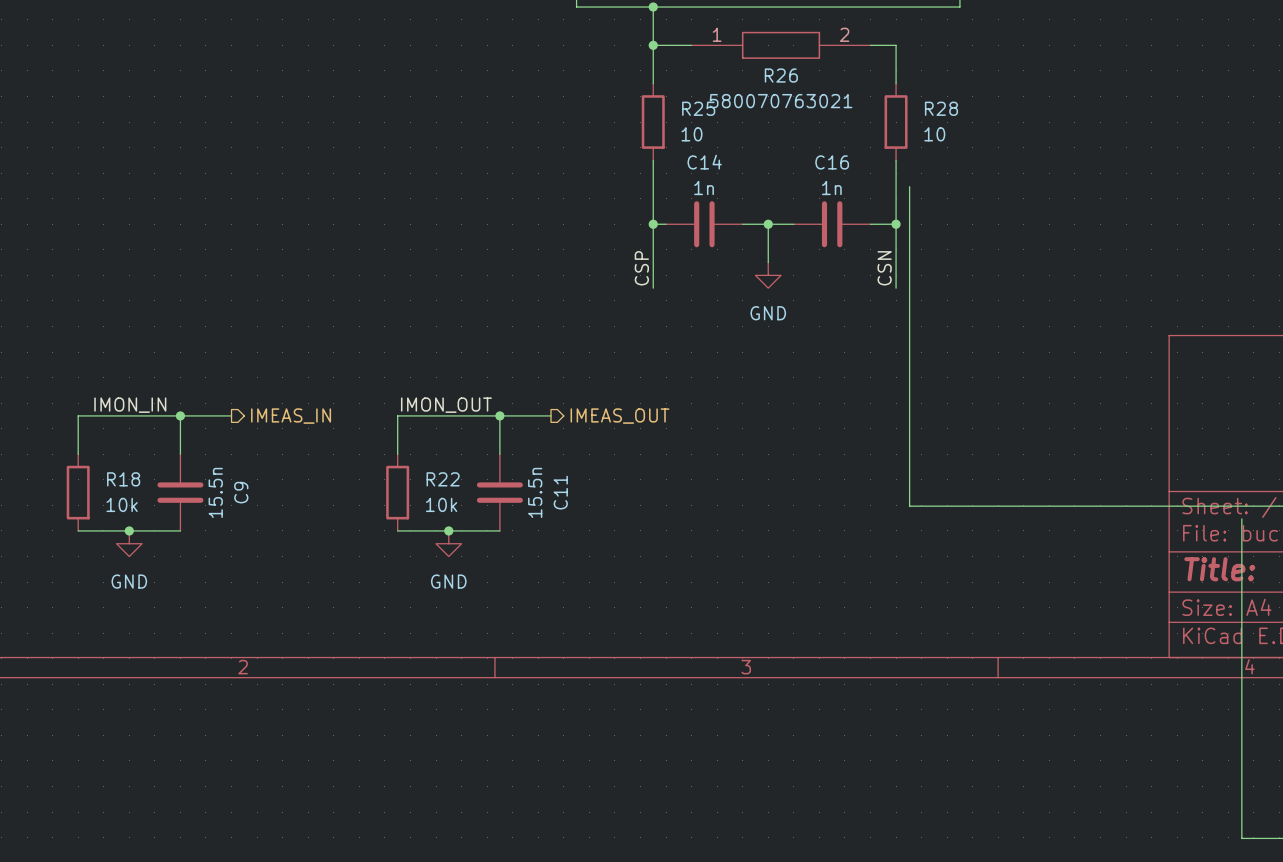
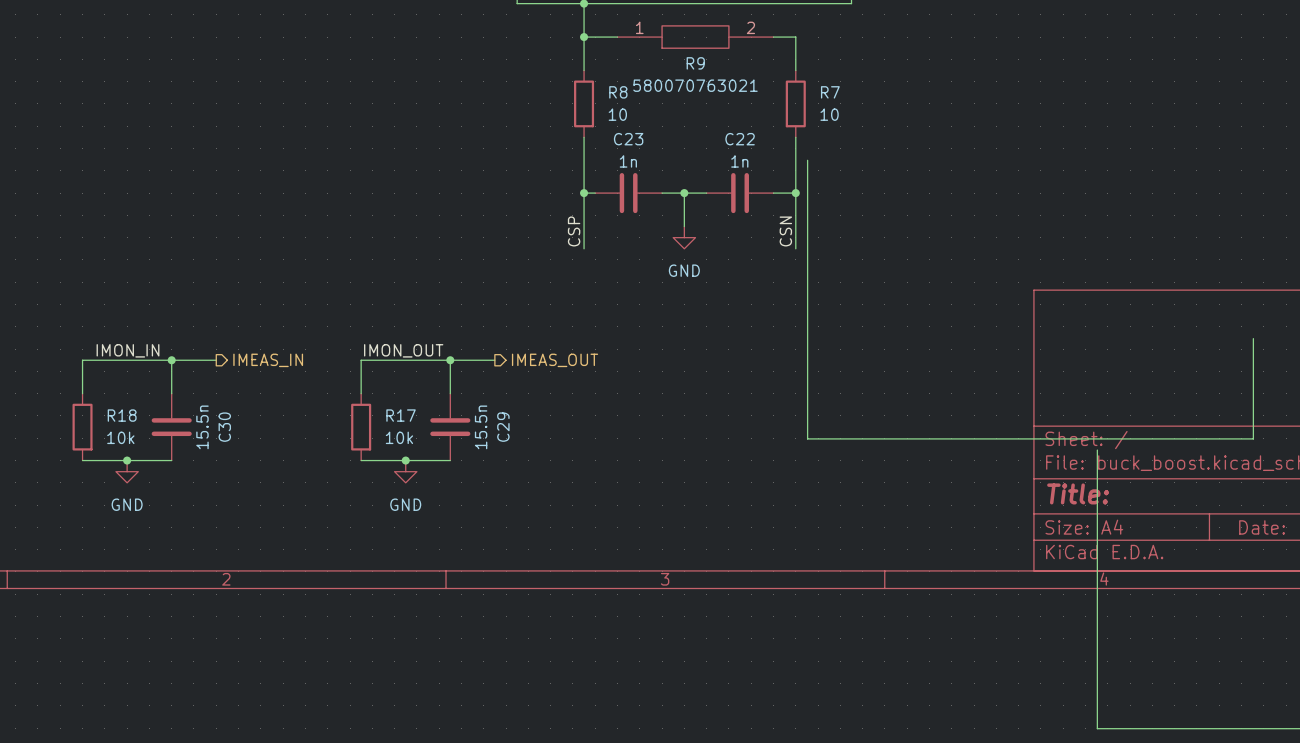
R26 name: R26 (781, 75) -> R9 (695, 63)
R25 name: R25 (698, 108) -> R8 (618, 92)
R28 name: R28 (941, 108) -> R7 (830, 92)
C14 name: C14 (704, 162) -> C23 (628, 139)
C16 name: C16 (832, 162) -> C22 (740, 139)
R22 name: R22 (443, 479) -> R17 (401, 415)
C9 name: C9 (241, 492) -> C30 (224, 427)
C11 name: C11 (560, 492) -> C29 (503, 427)

